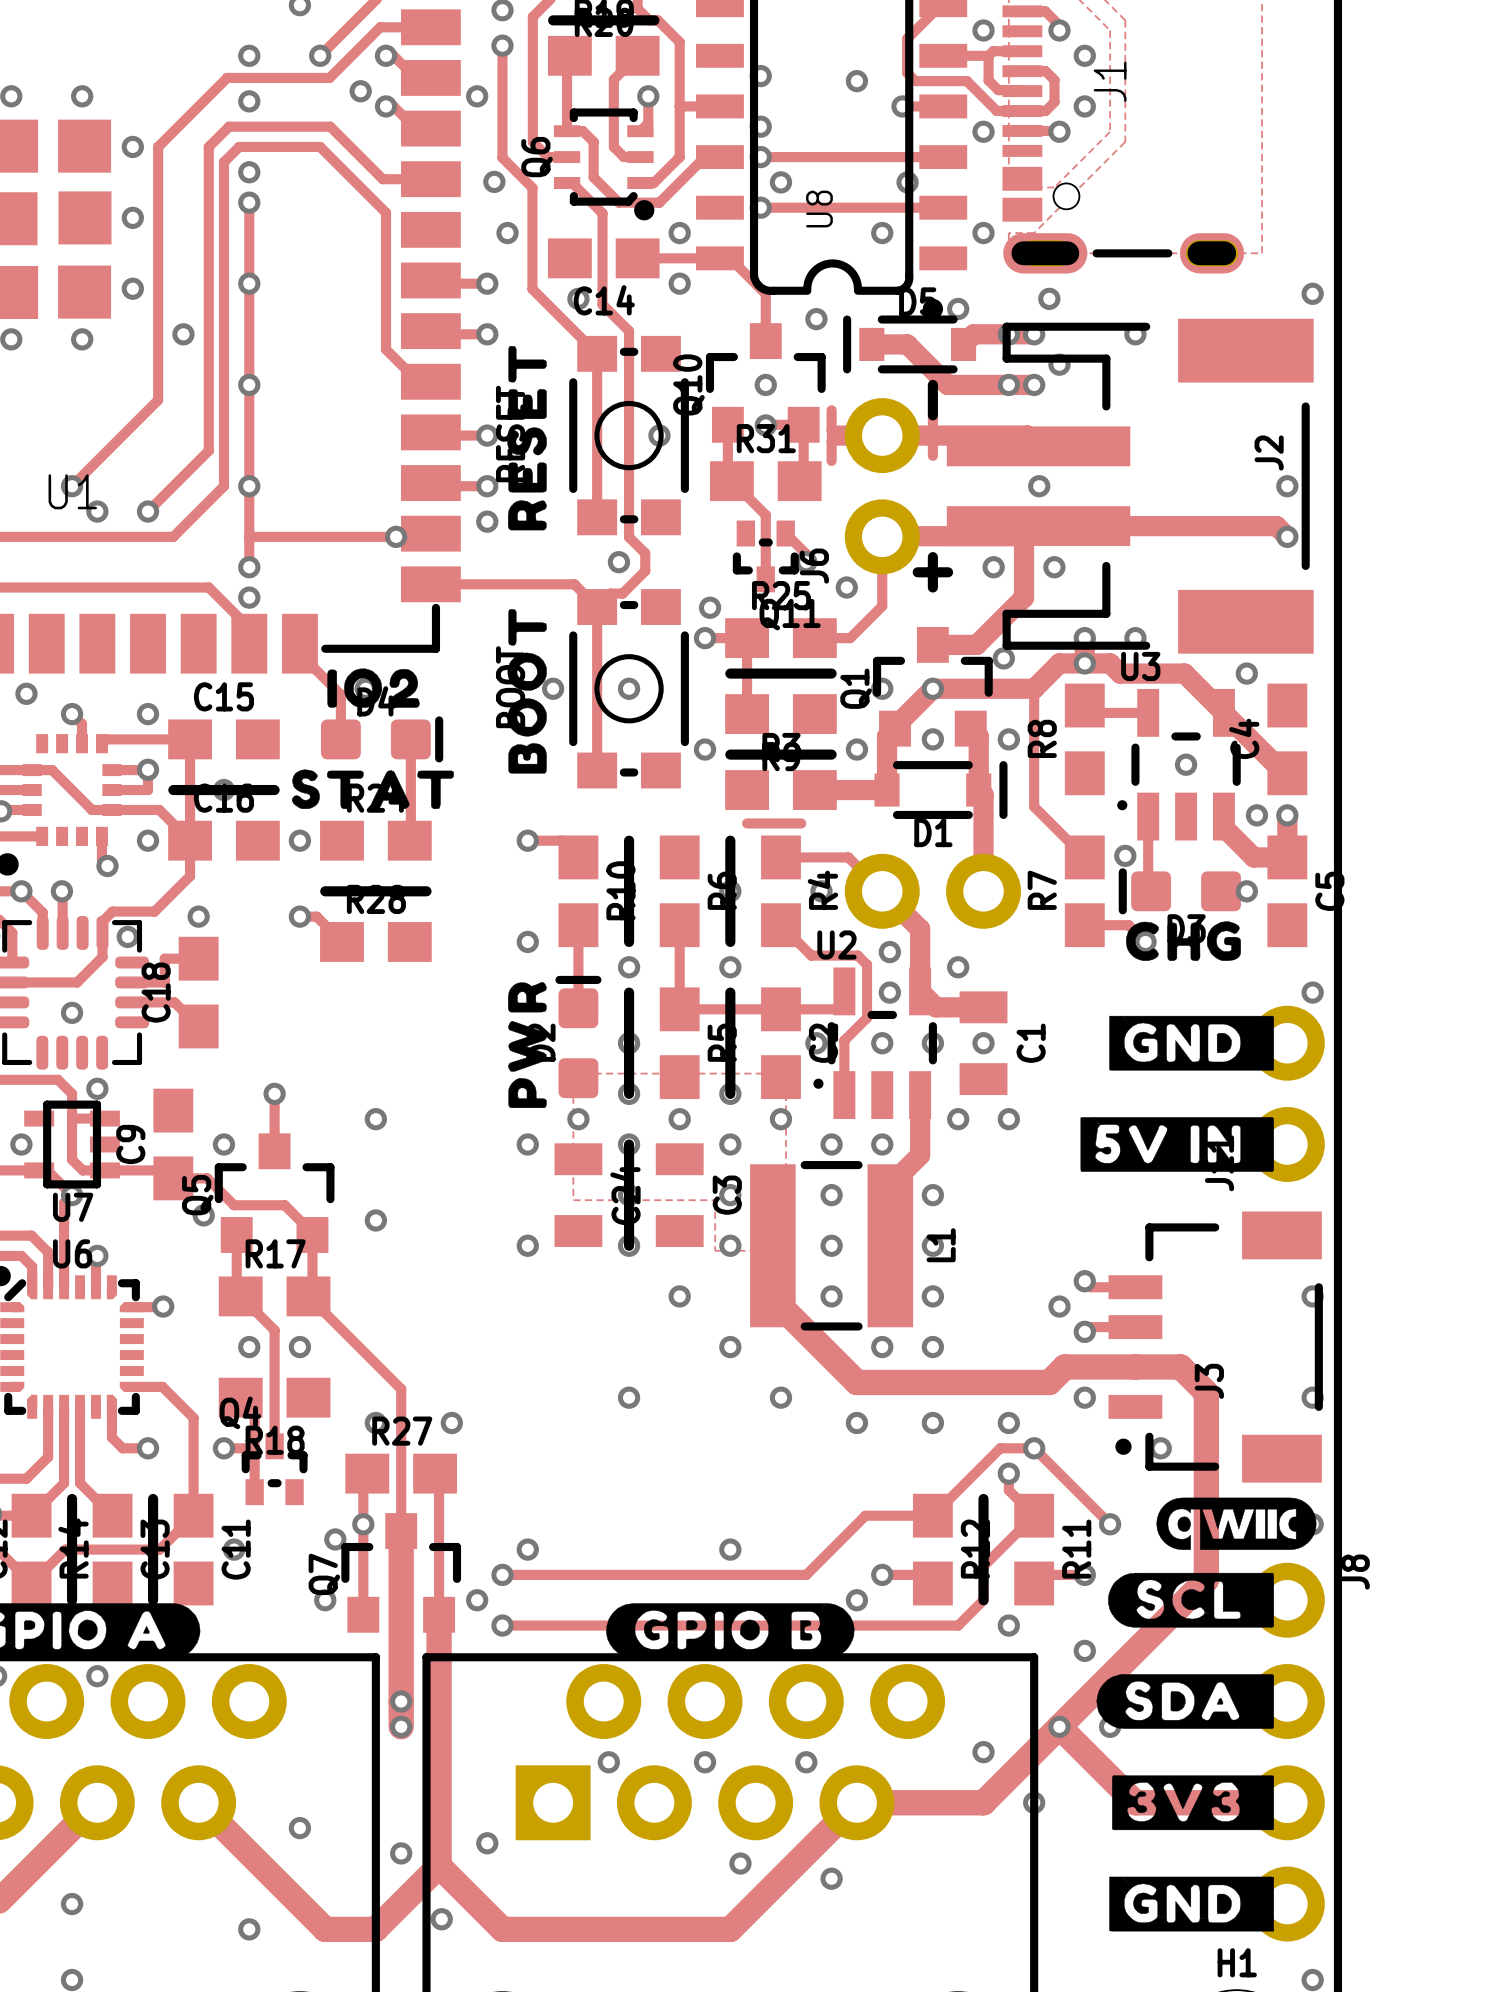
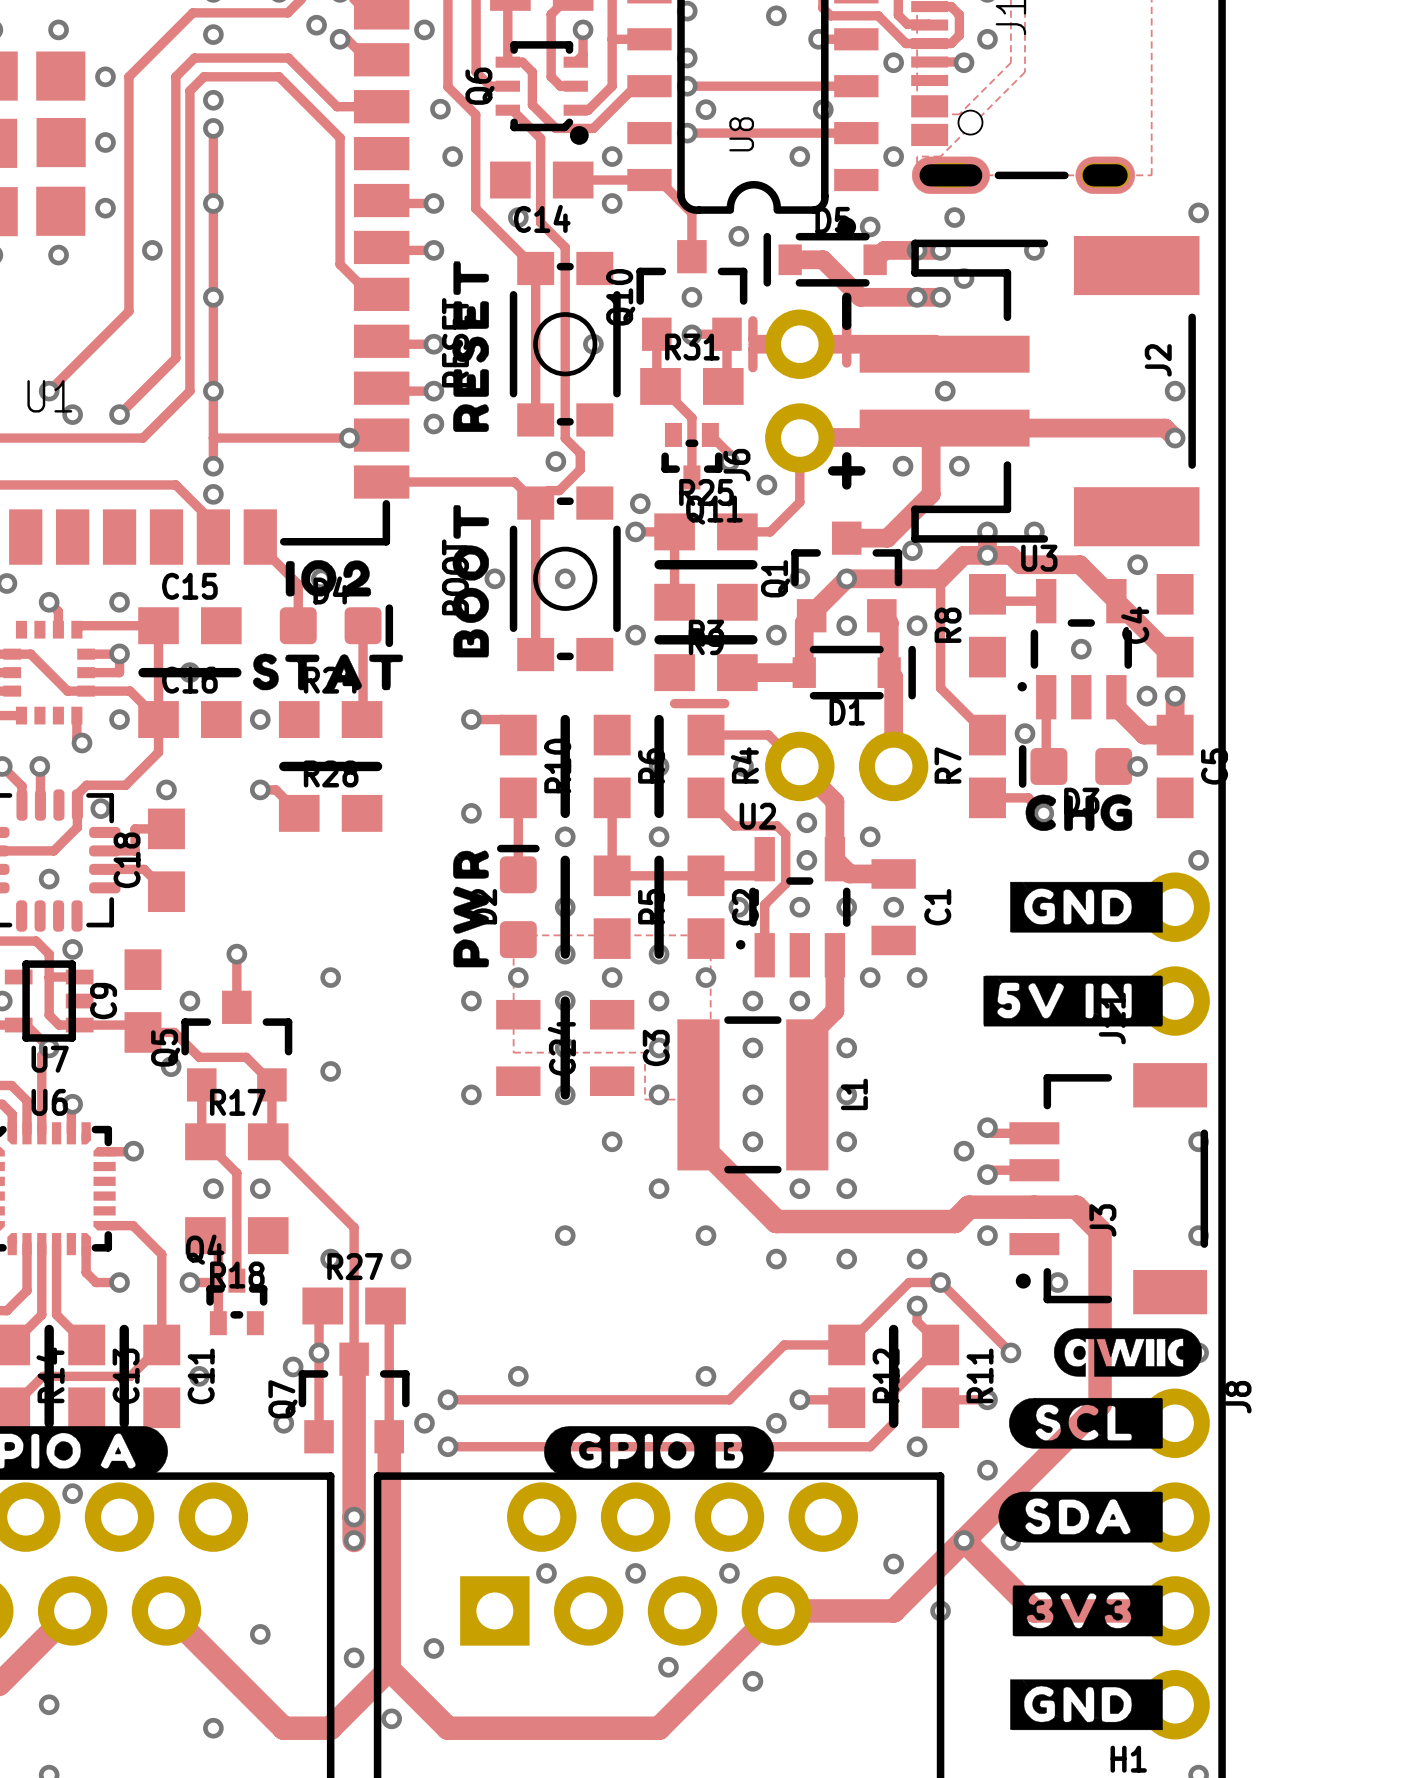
via position: (527, 1549) -> (518, 1376)
via position: (730, 1549) -> (705, 1376)

